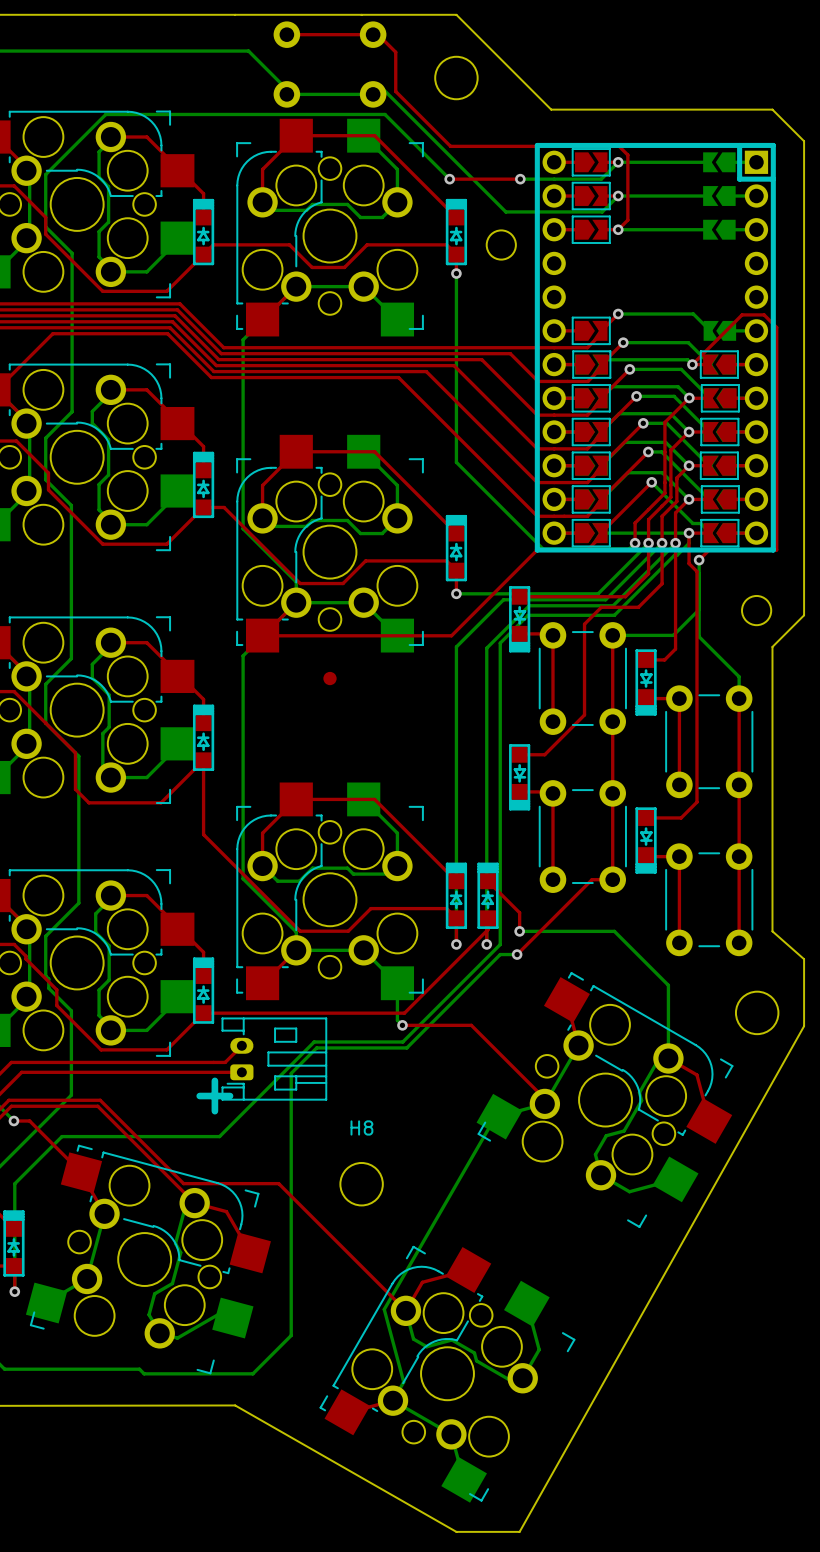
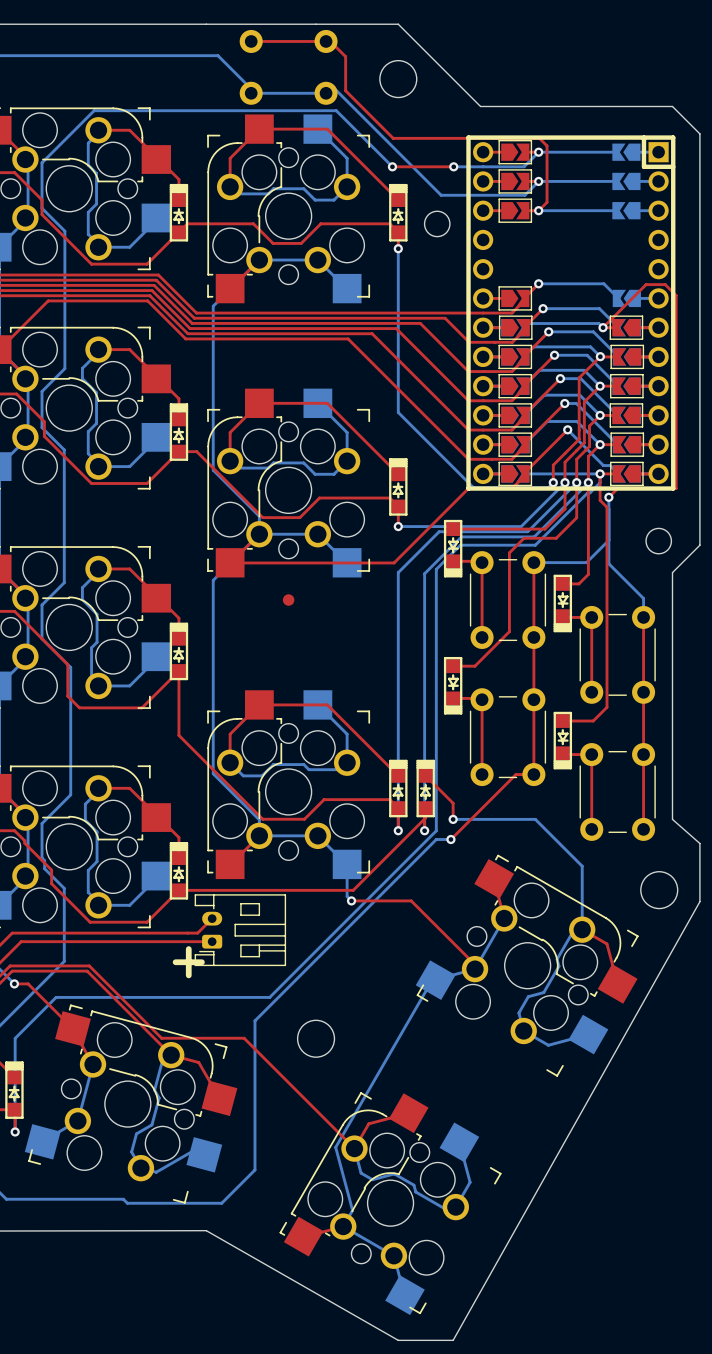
bottom track: (402, 1041) (314, 1041) (219, 1136) -> (351, 915) (269, 997) (192, 997)
bottom track: (406, 1047) (316, 1047) (291, 1073) (291, 1163) -> (355, 920) (254, 1020)
H8 name: H8 (361, 1127) -> none

